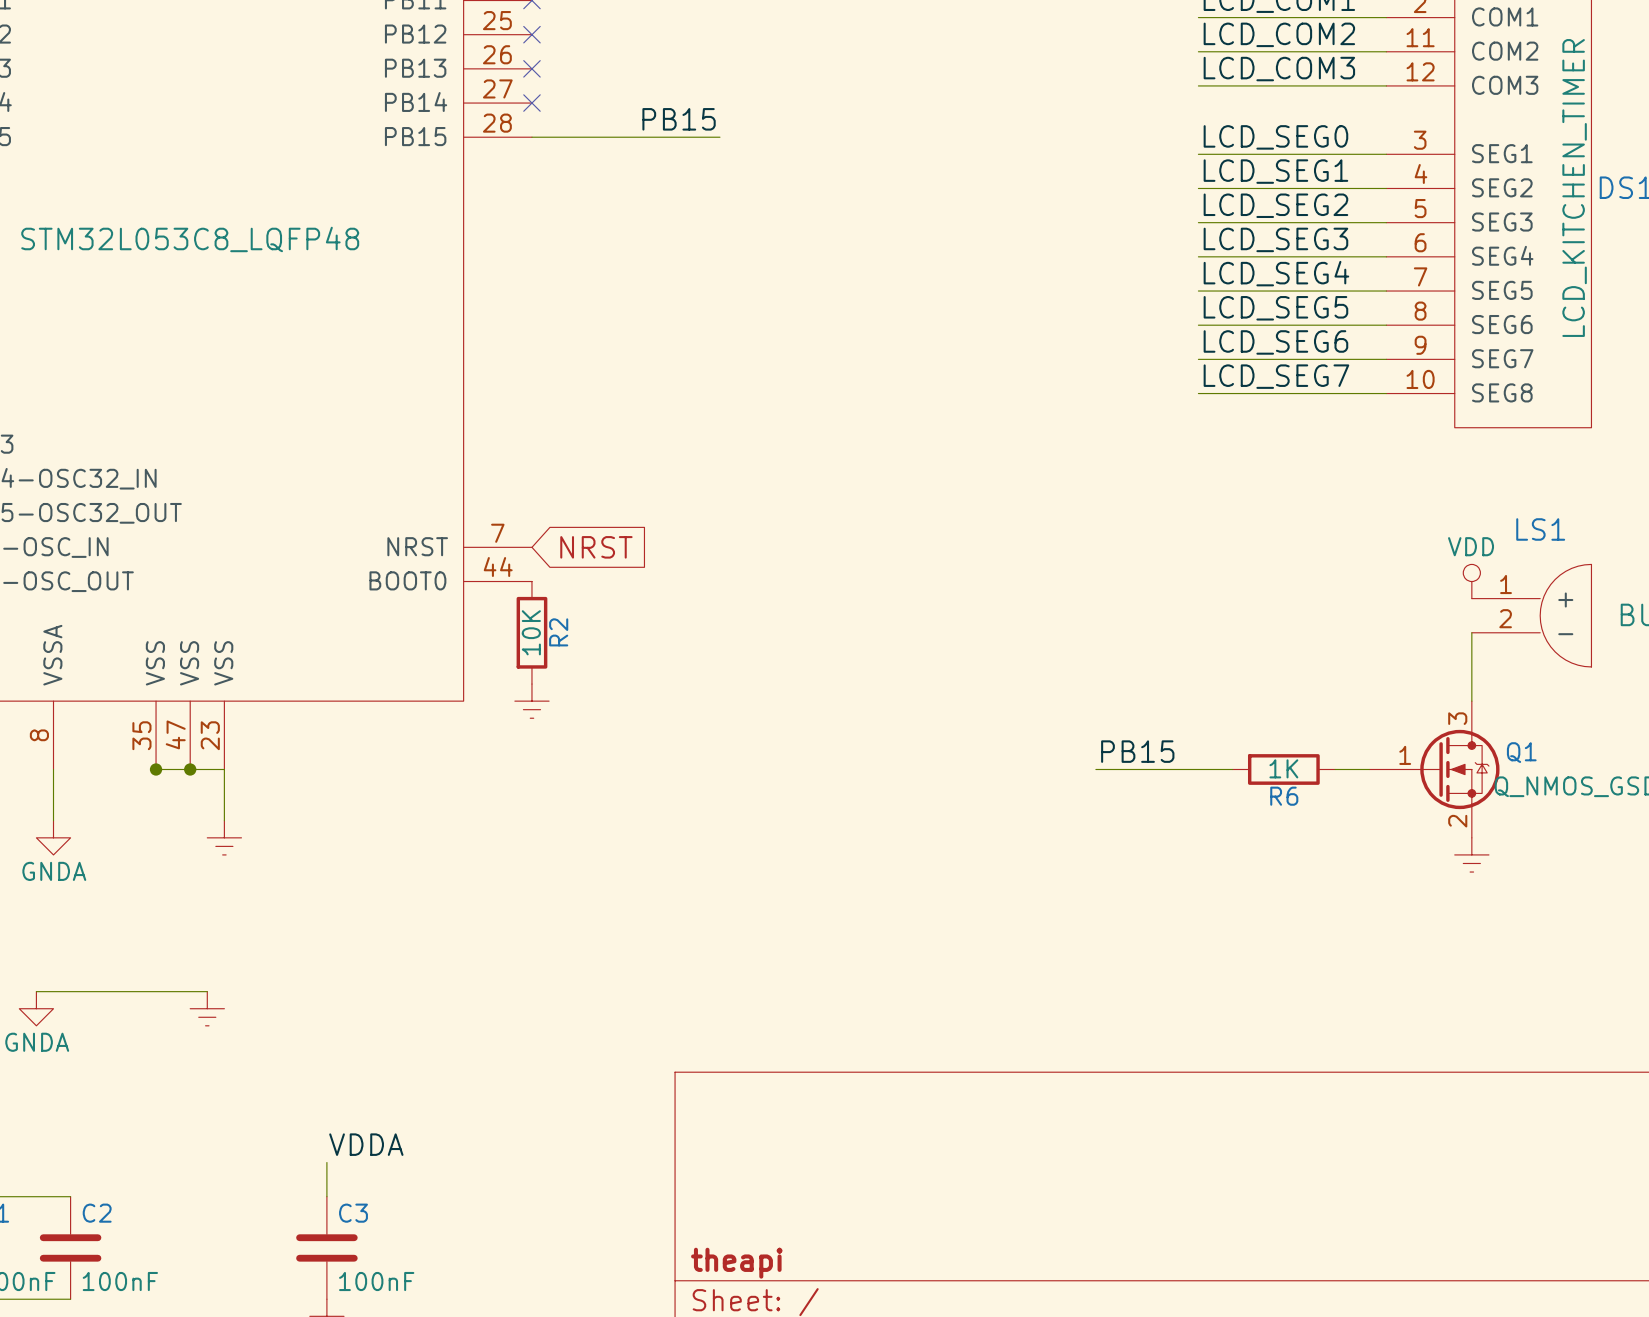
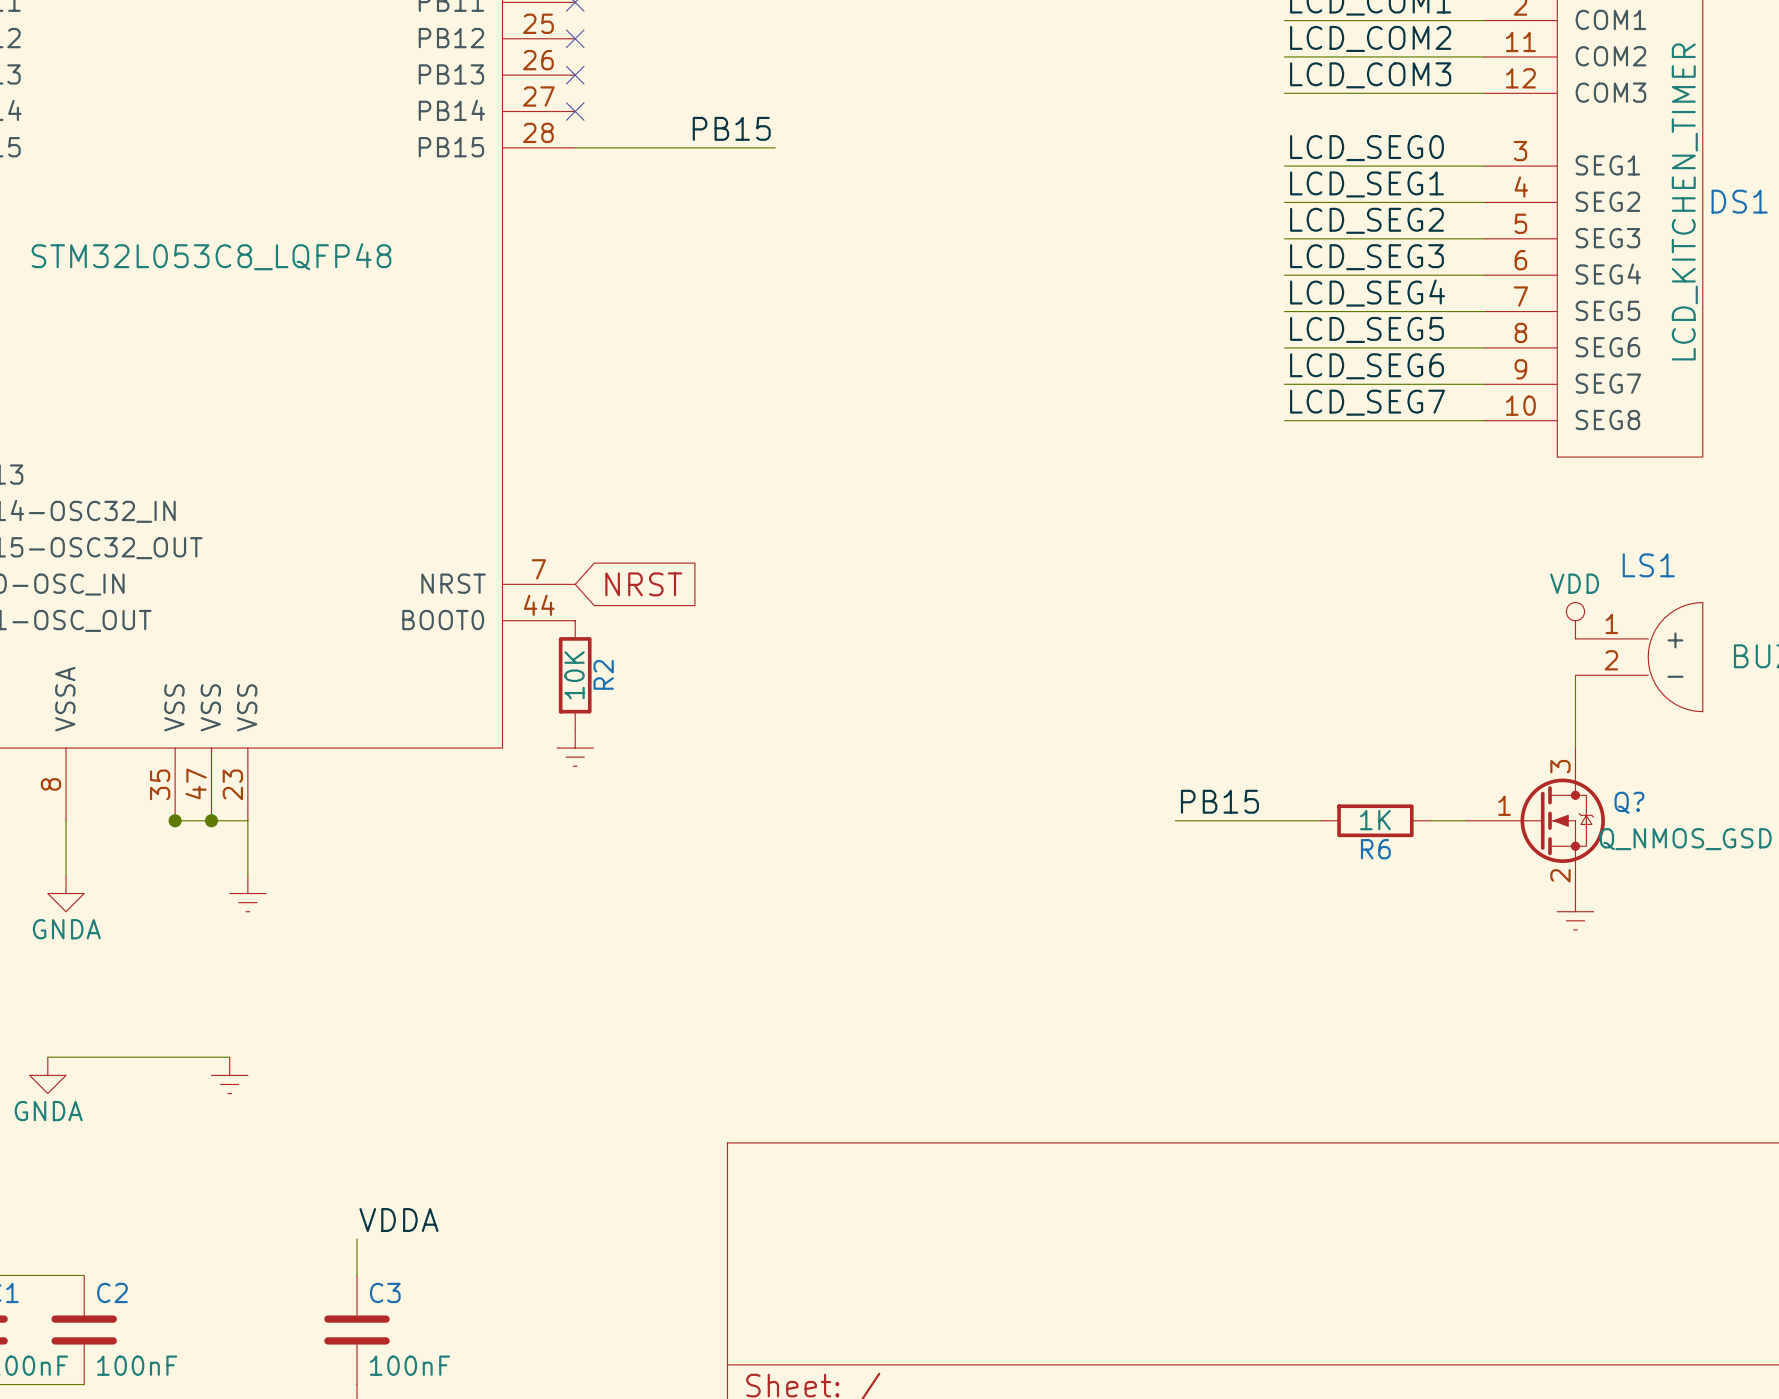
Q1 name: Q1 (1521, 752) -> Q? (1629, 802)
title block: theapi (736, 1263) -> none

